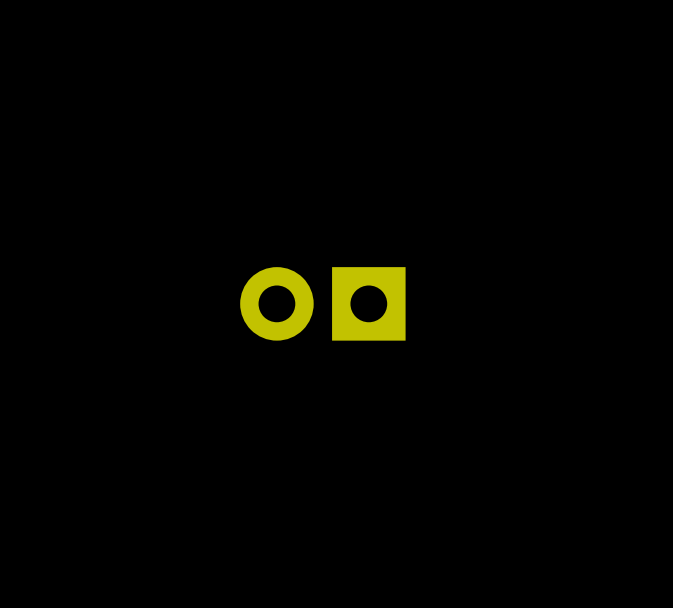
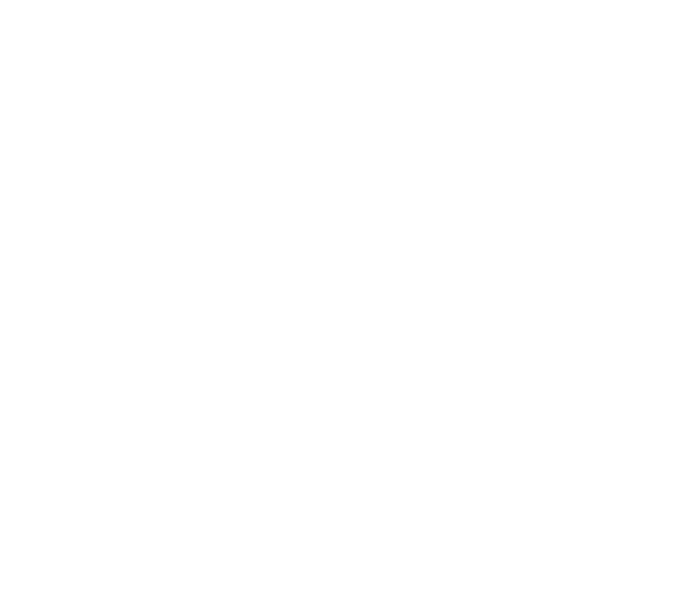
part: (322, 303) -> none

